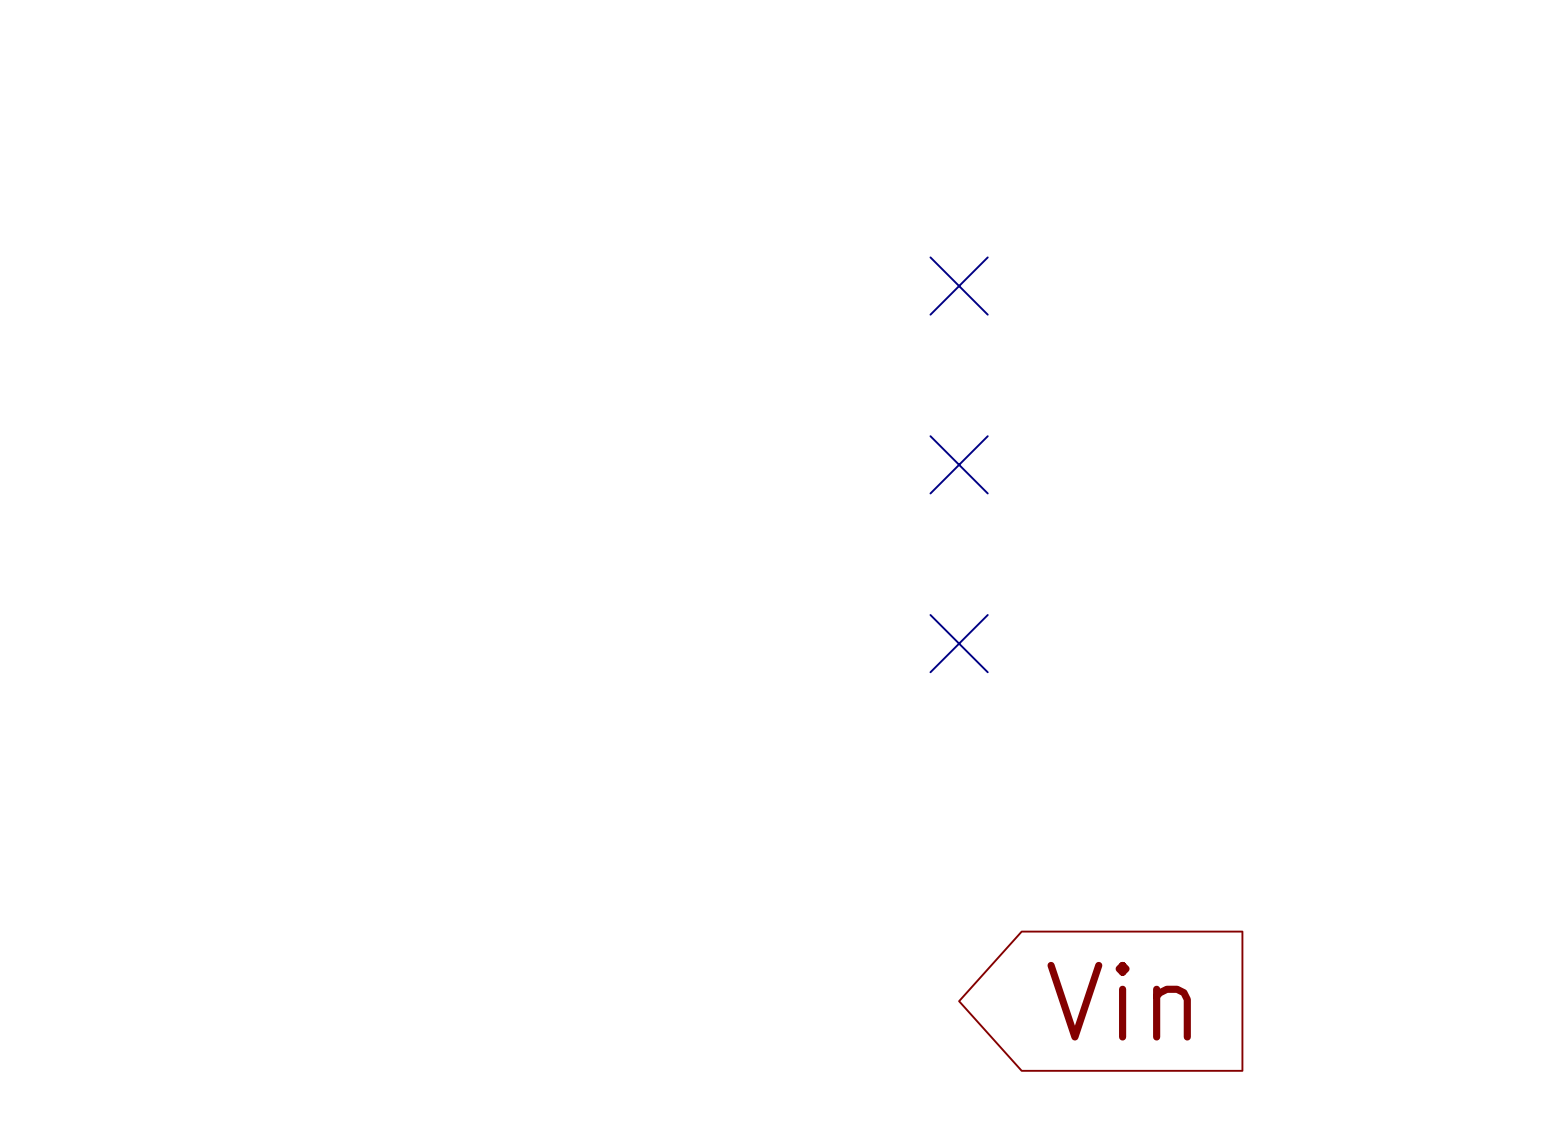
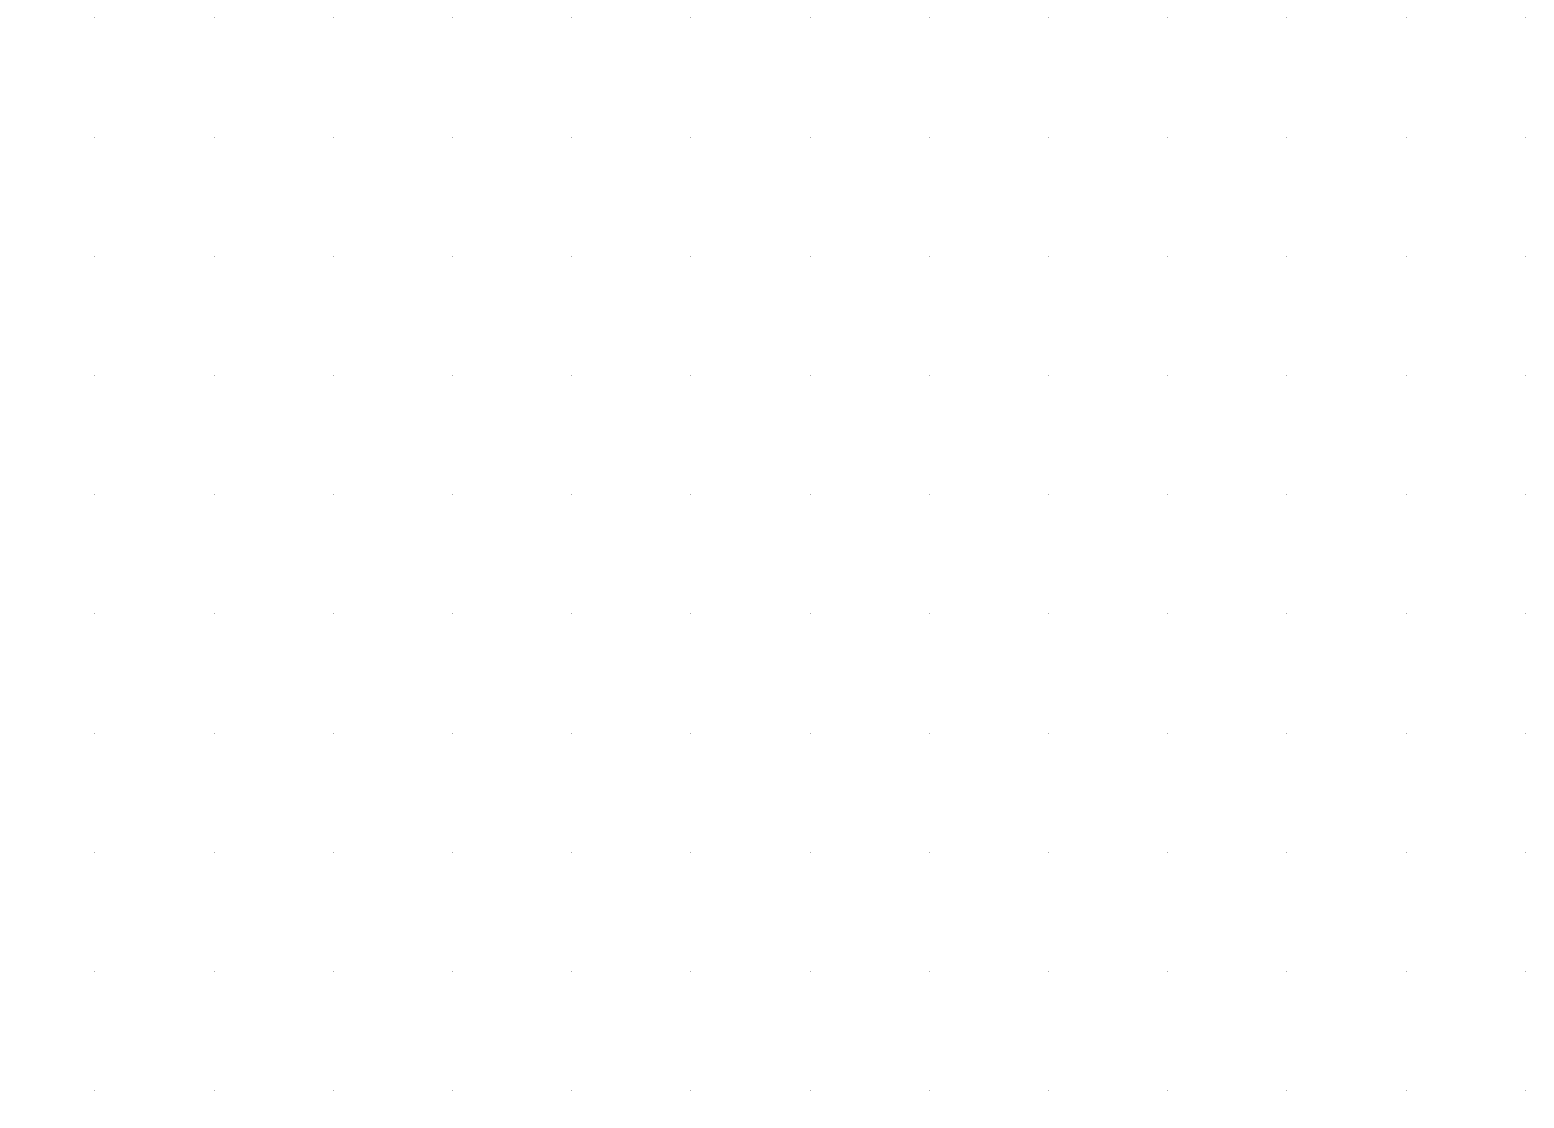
no-connect mark: (959, 286) -> none
no-connect mark: (959, 464) -> none
no-connect mark: (959, 643) -> none
global label: Vin (1119, 1001) -> none

